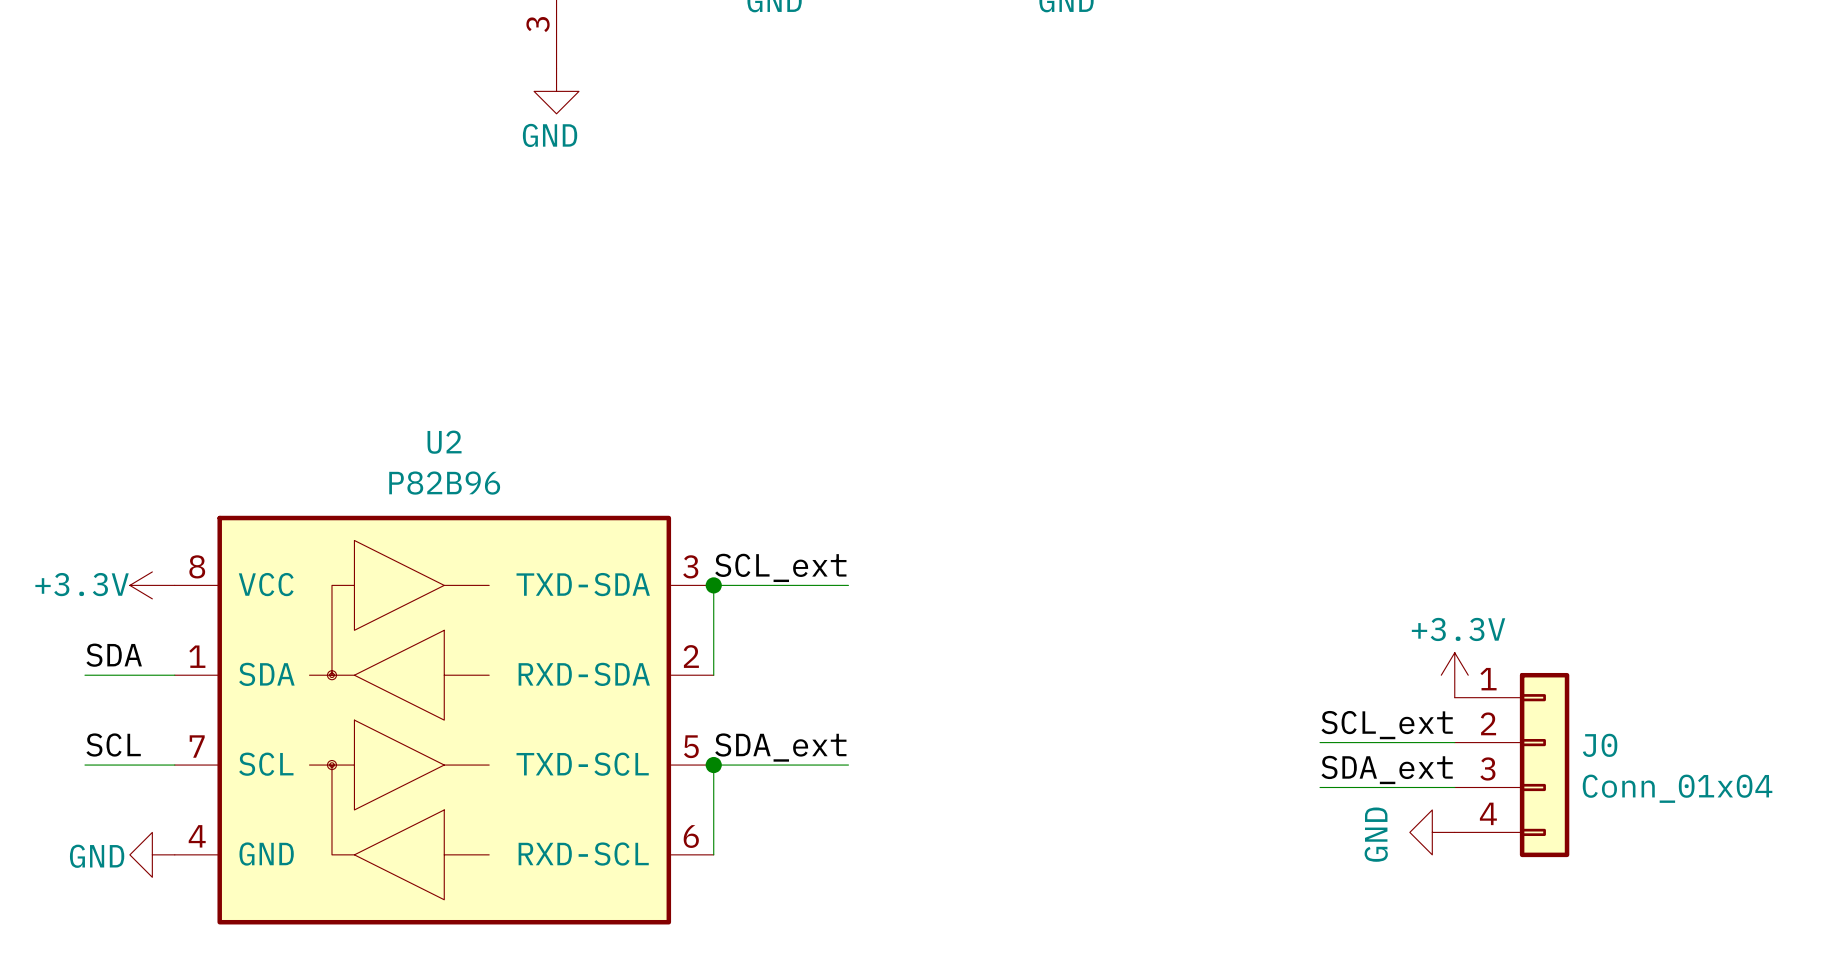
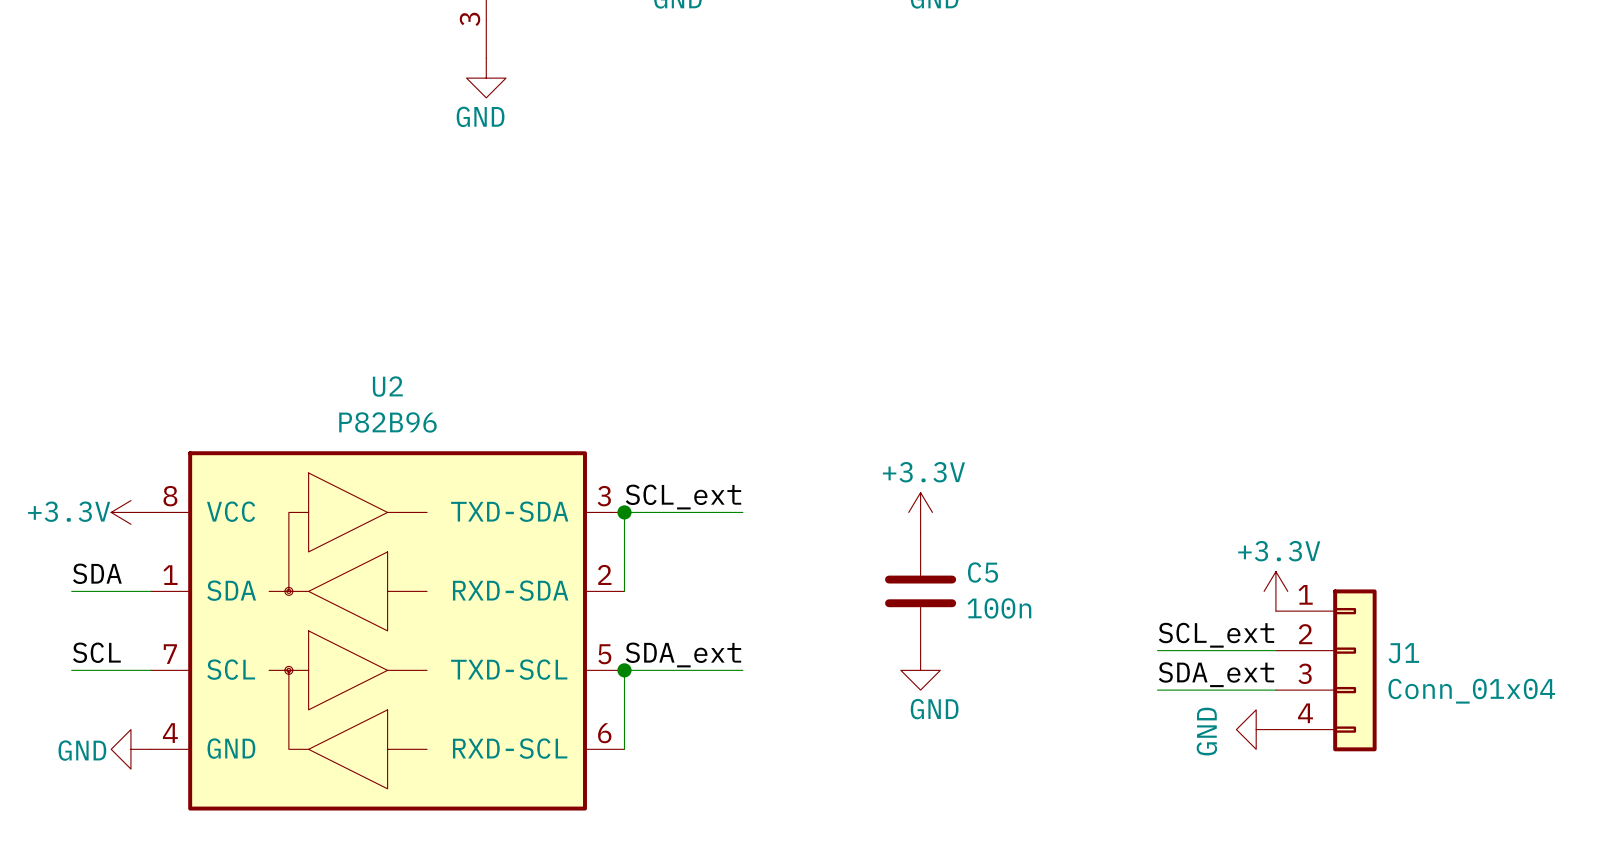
power symbol: none -> +3.3V (920, 512)
C5: none -> 100n (920, 591)
J0 name: J0 (1600, 745) -> J1 (1403, 653)
power symbol: none -> GND (920, 670)

